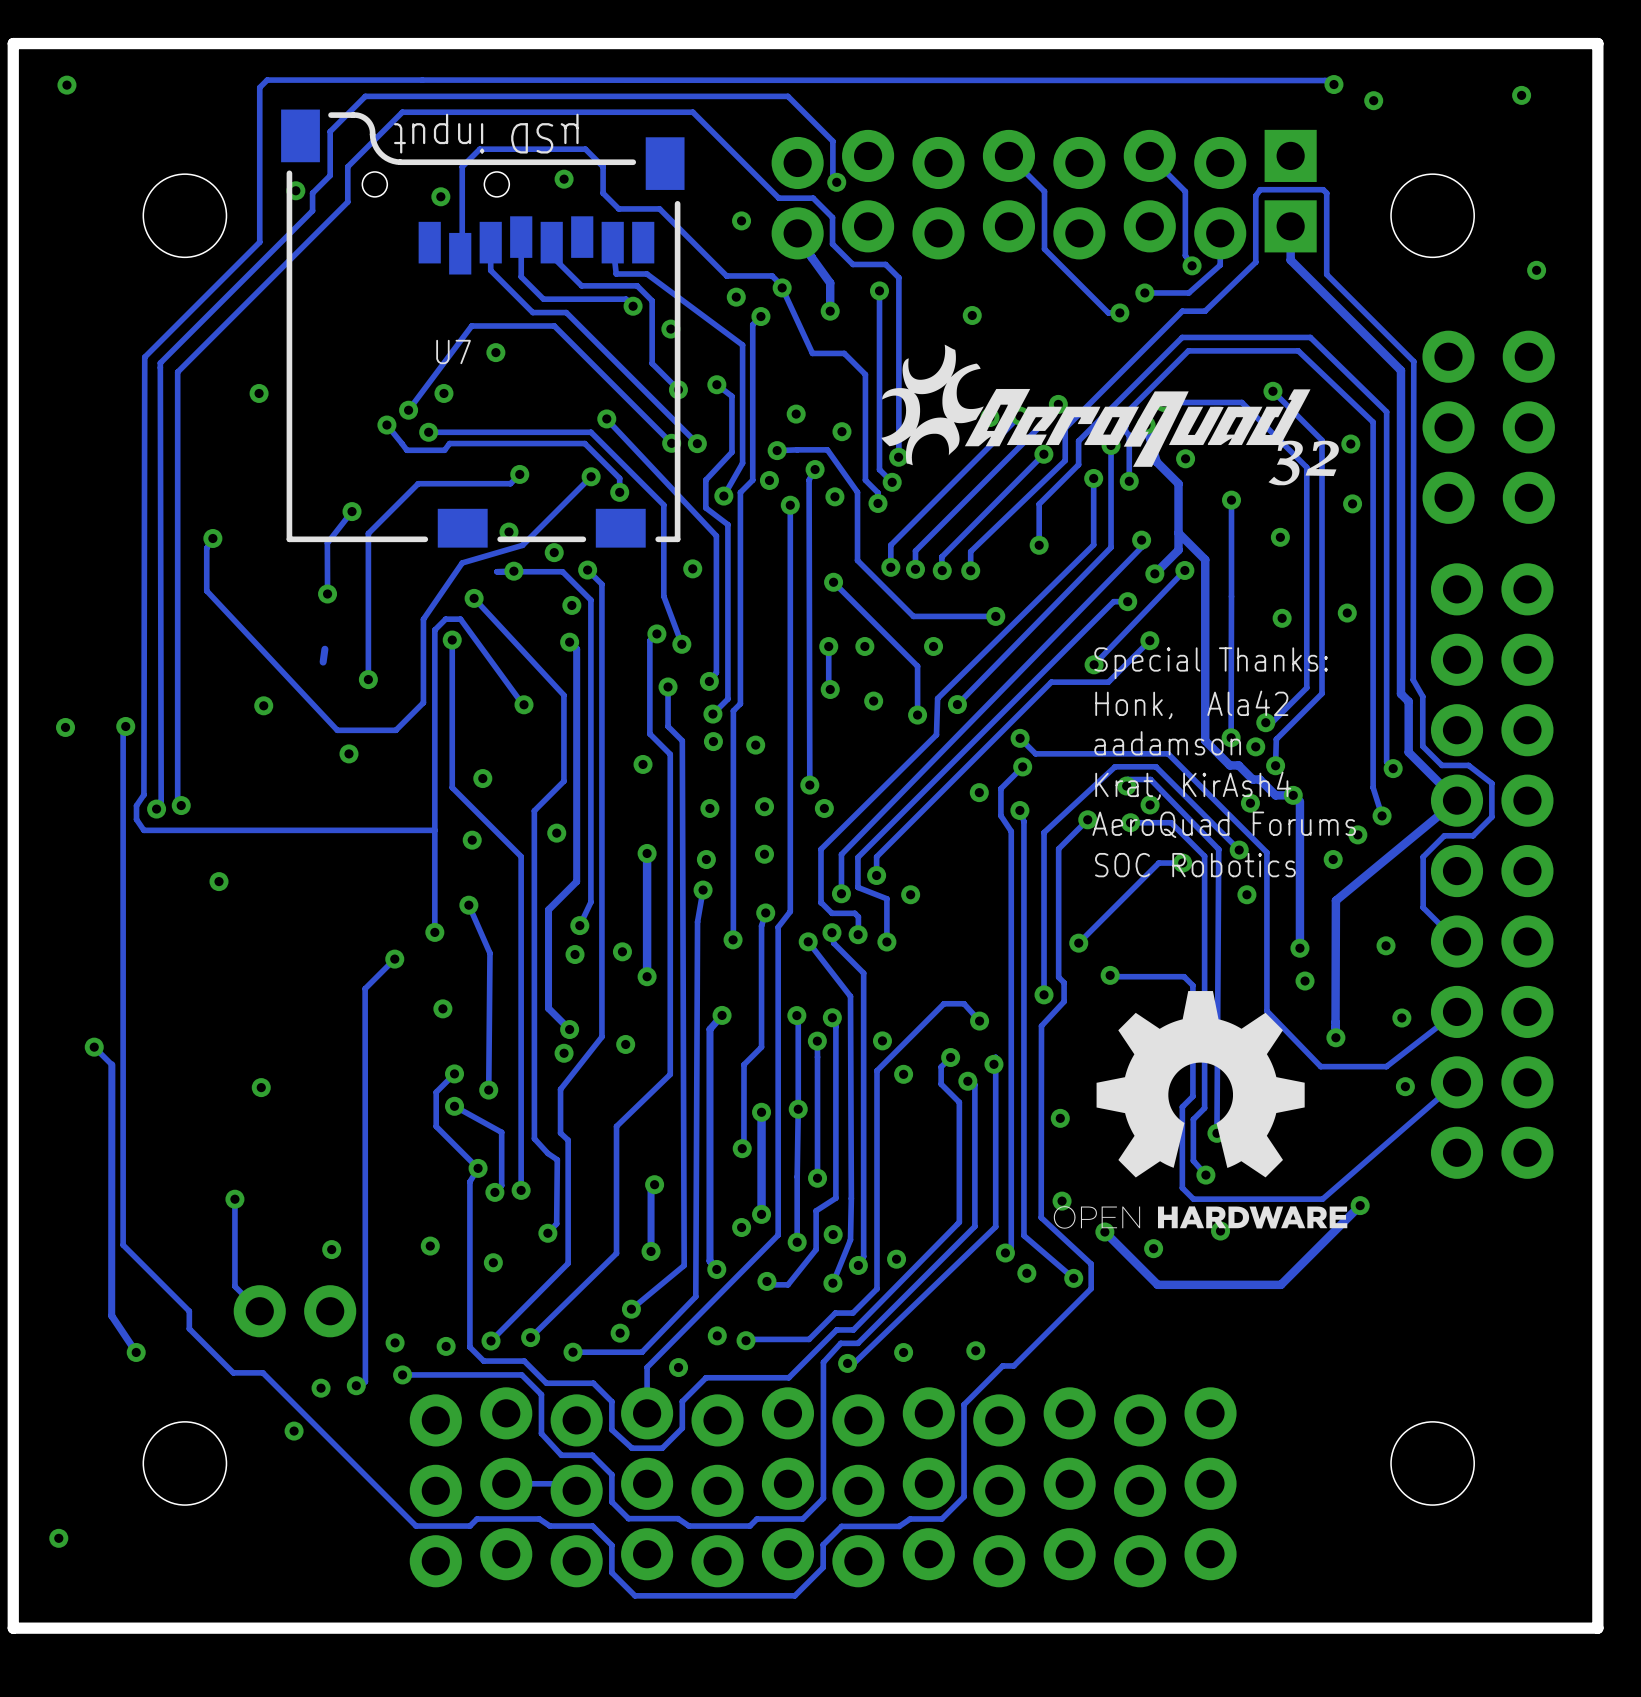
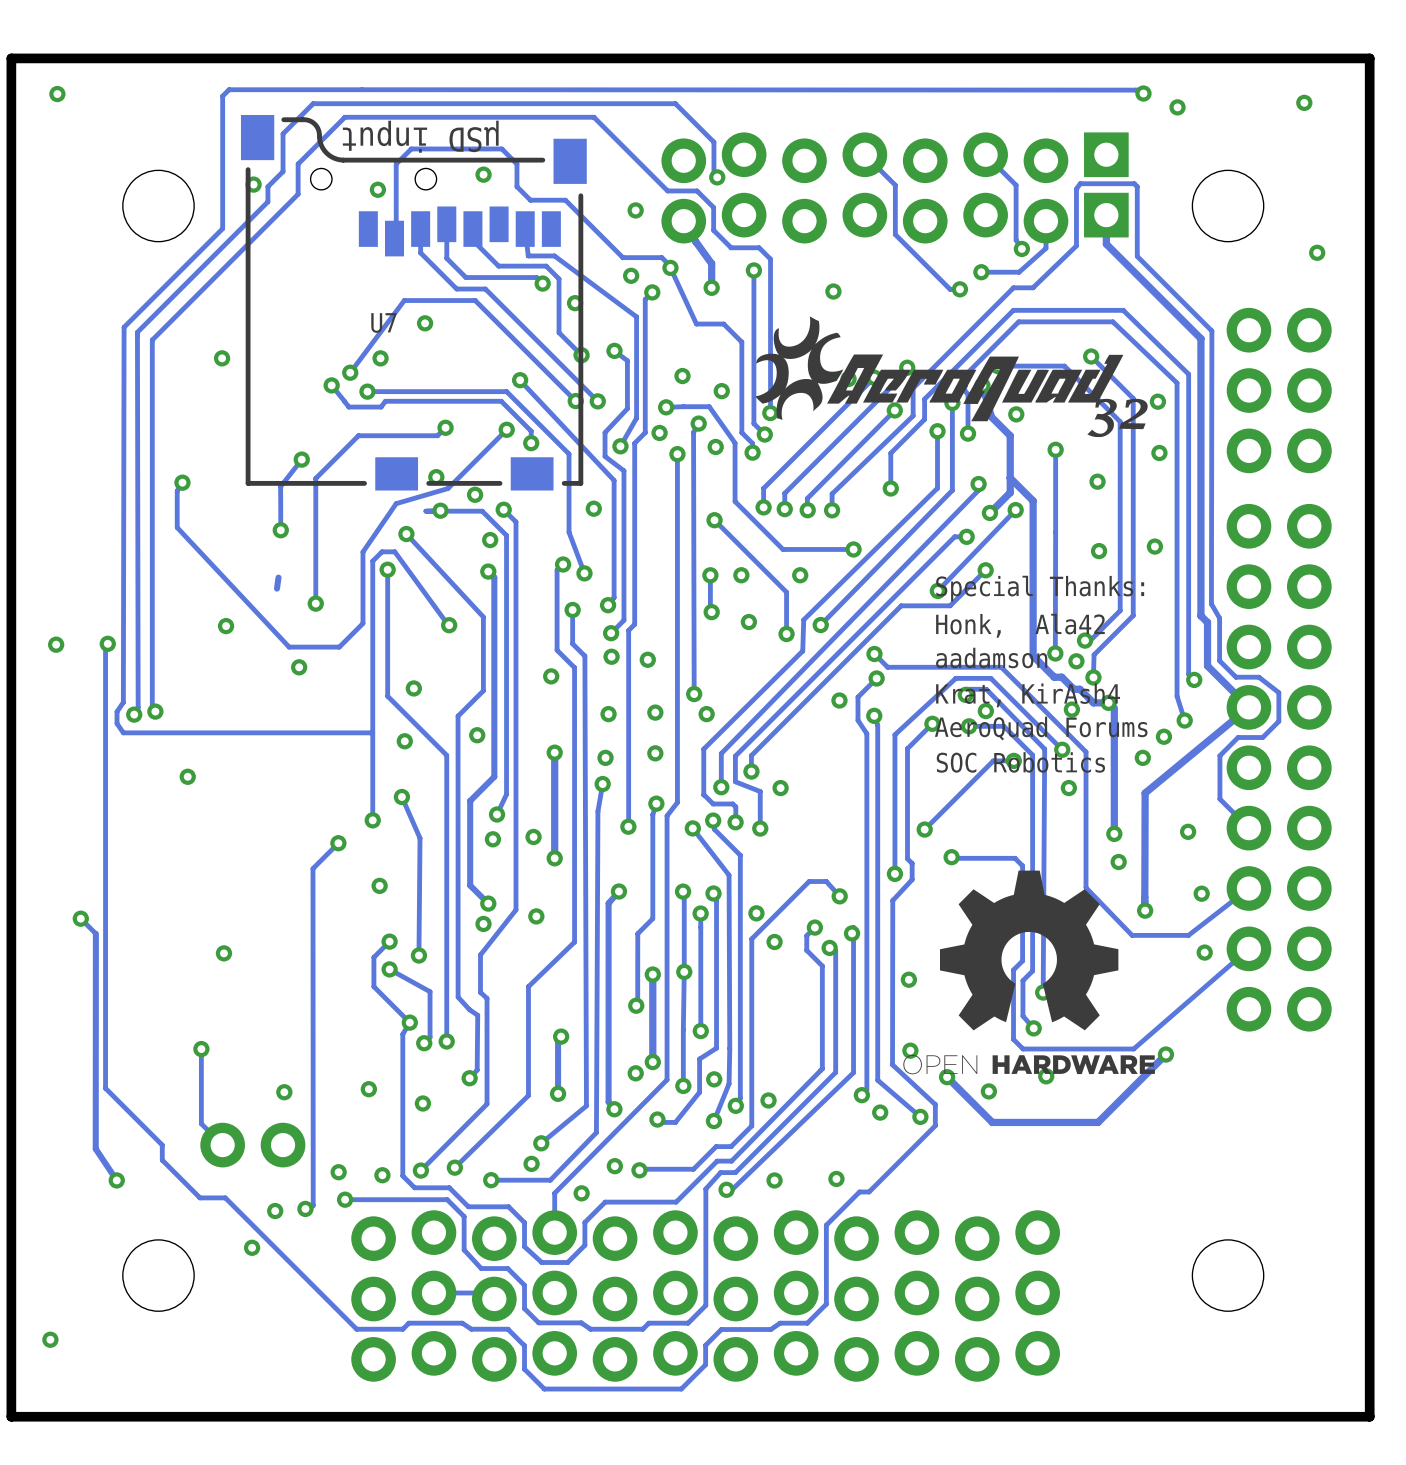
part footprint: [1422, 330, 1555, 383] -> [1226, 307, 1332, 353]
part footprint: [1422, 401, 1555, 454] -> [1226, 368, 1332, 413]
part footprint: [1422, 471, 1555, 524] -> [1226, 428, 1332, 474]

